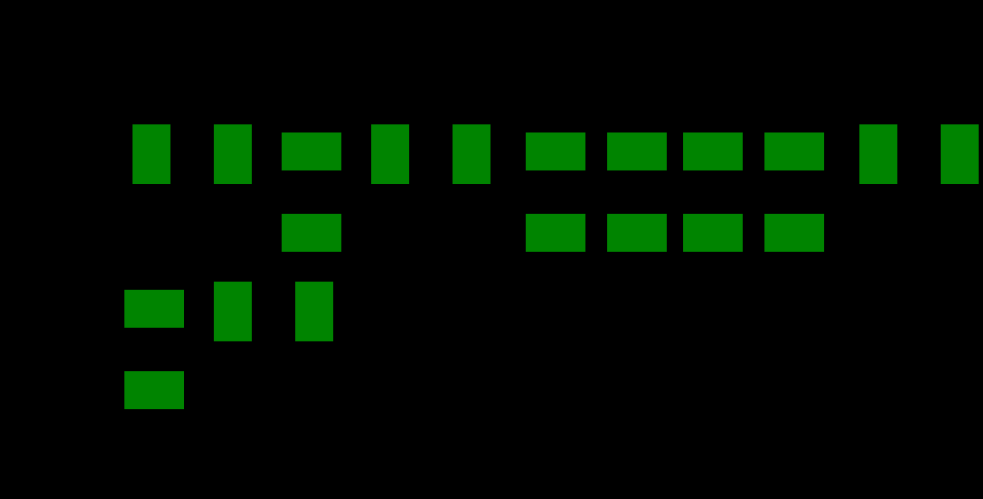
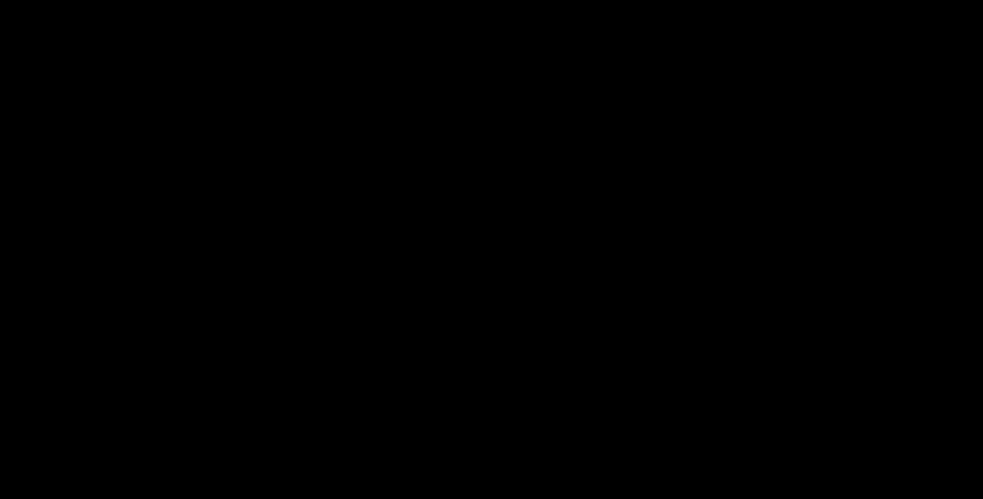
part: (192, 154) -> none
part: (430, 154) -> none
part: (919, 154) -> none
part: (311, 192) -> none
part: (555, 192) -> none
part: (636, 192) -> none
part: (712, 192) -> none
part: (794, 192) -> none
part: (273, 311) -> none
part: (154, 349) -> none

